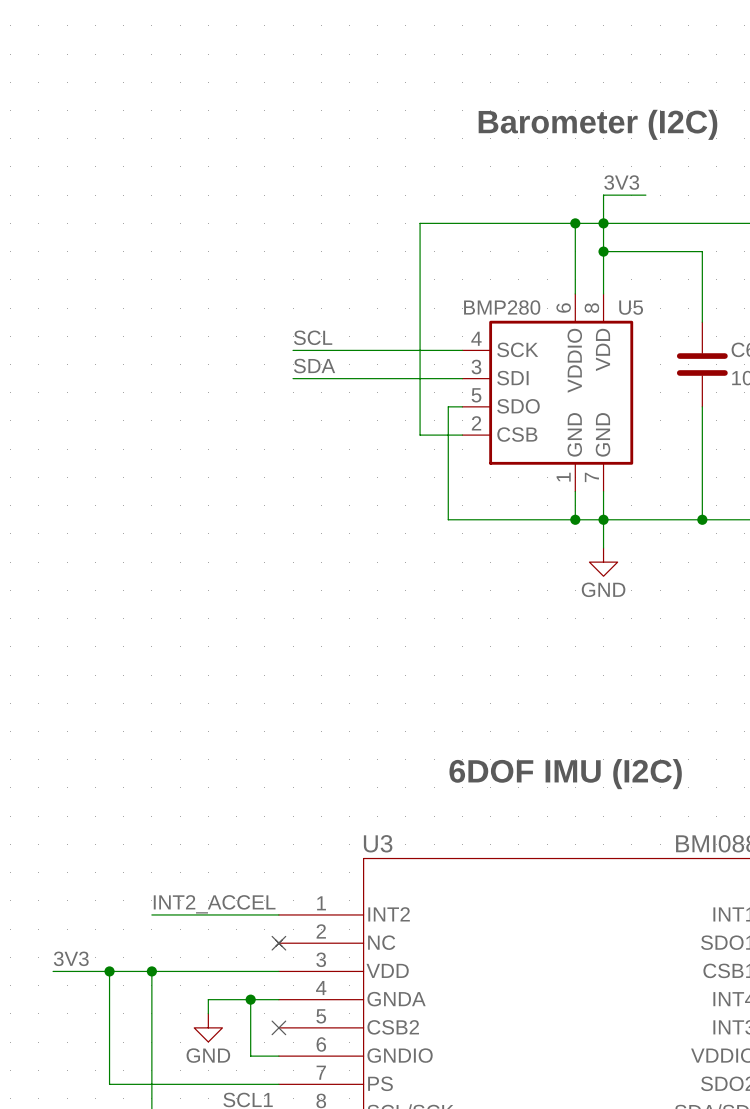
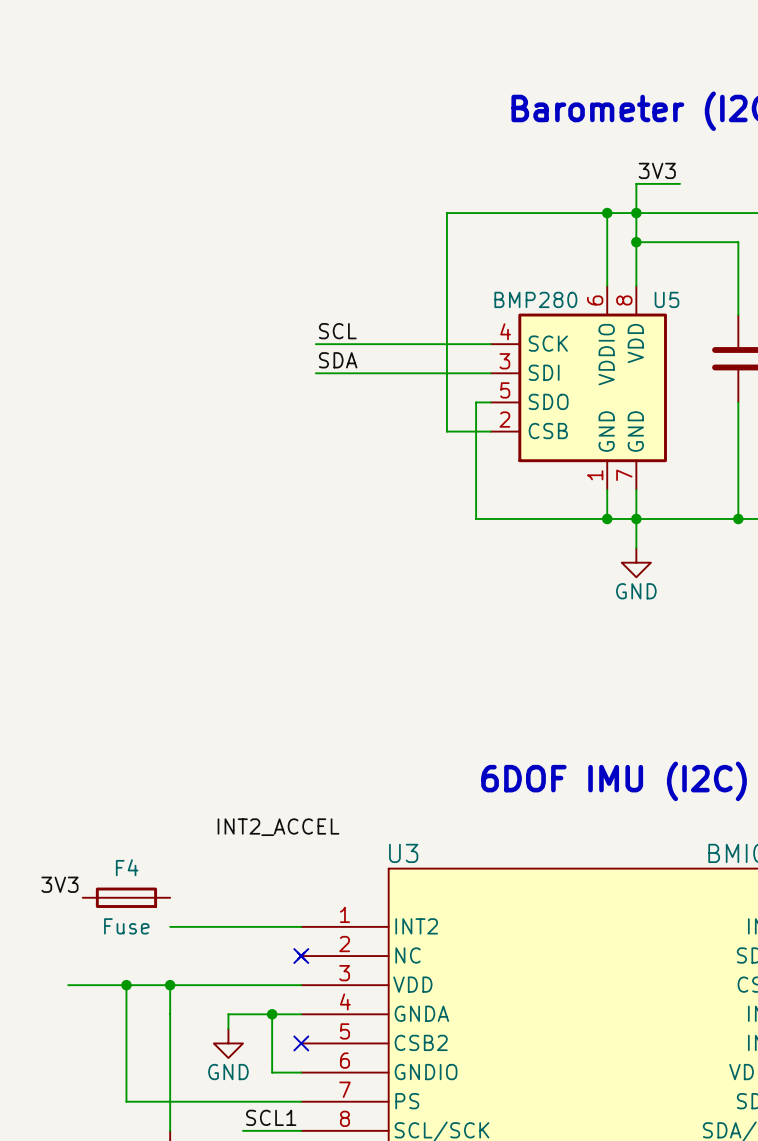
F4: none -> Fuse (126, 897)
label position: INT2_ACCEL (214, 904) -> INT2_ACCEL (278, 827)
label position: 3V3 (71, 958) -> 3V3 (59, 884)

